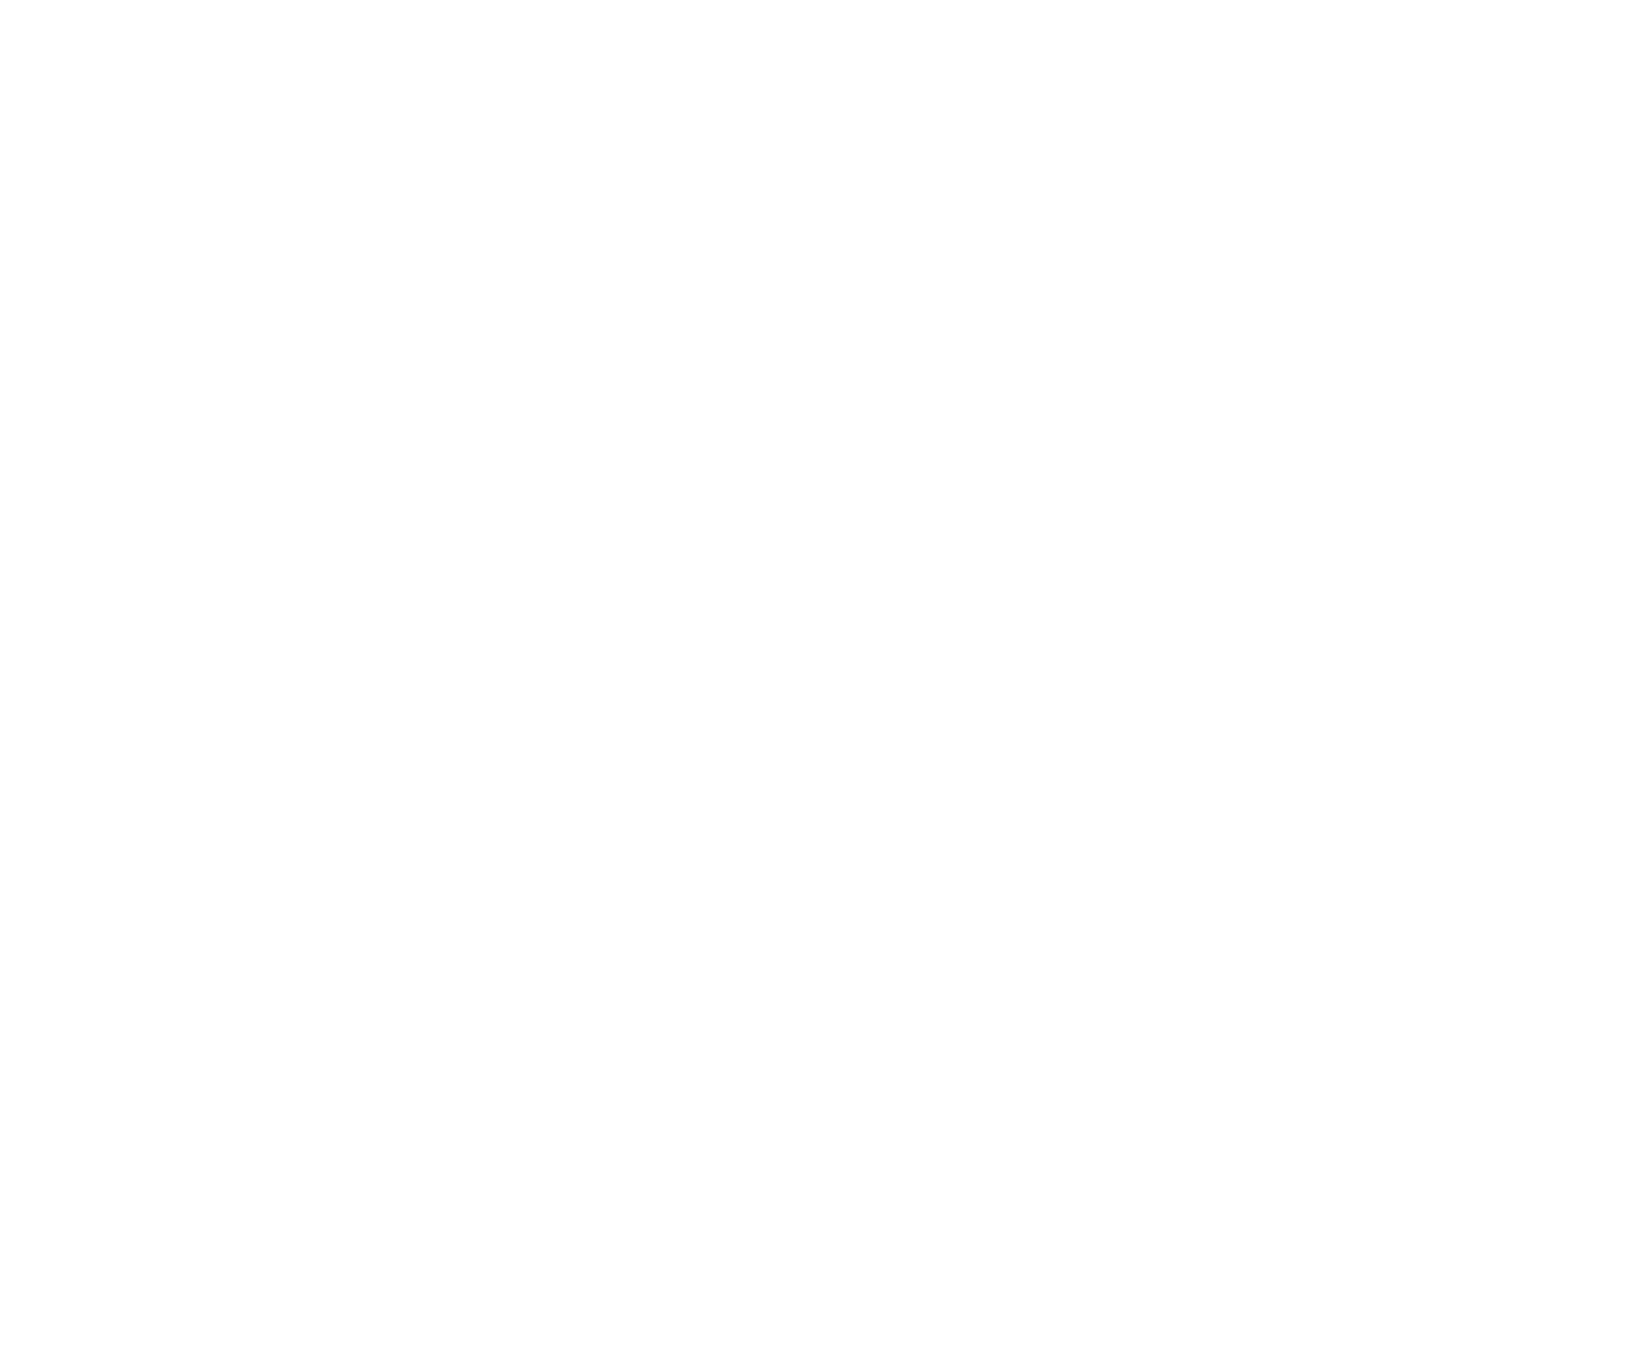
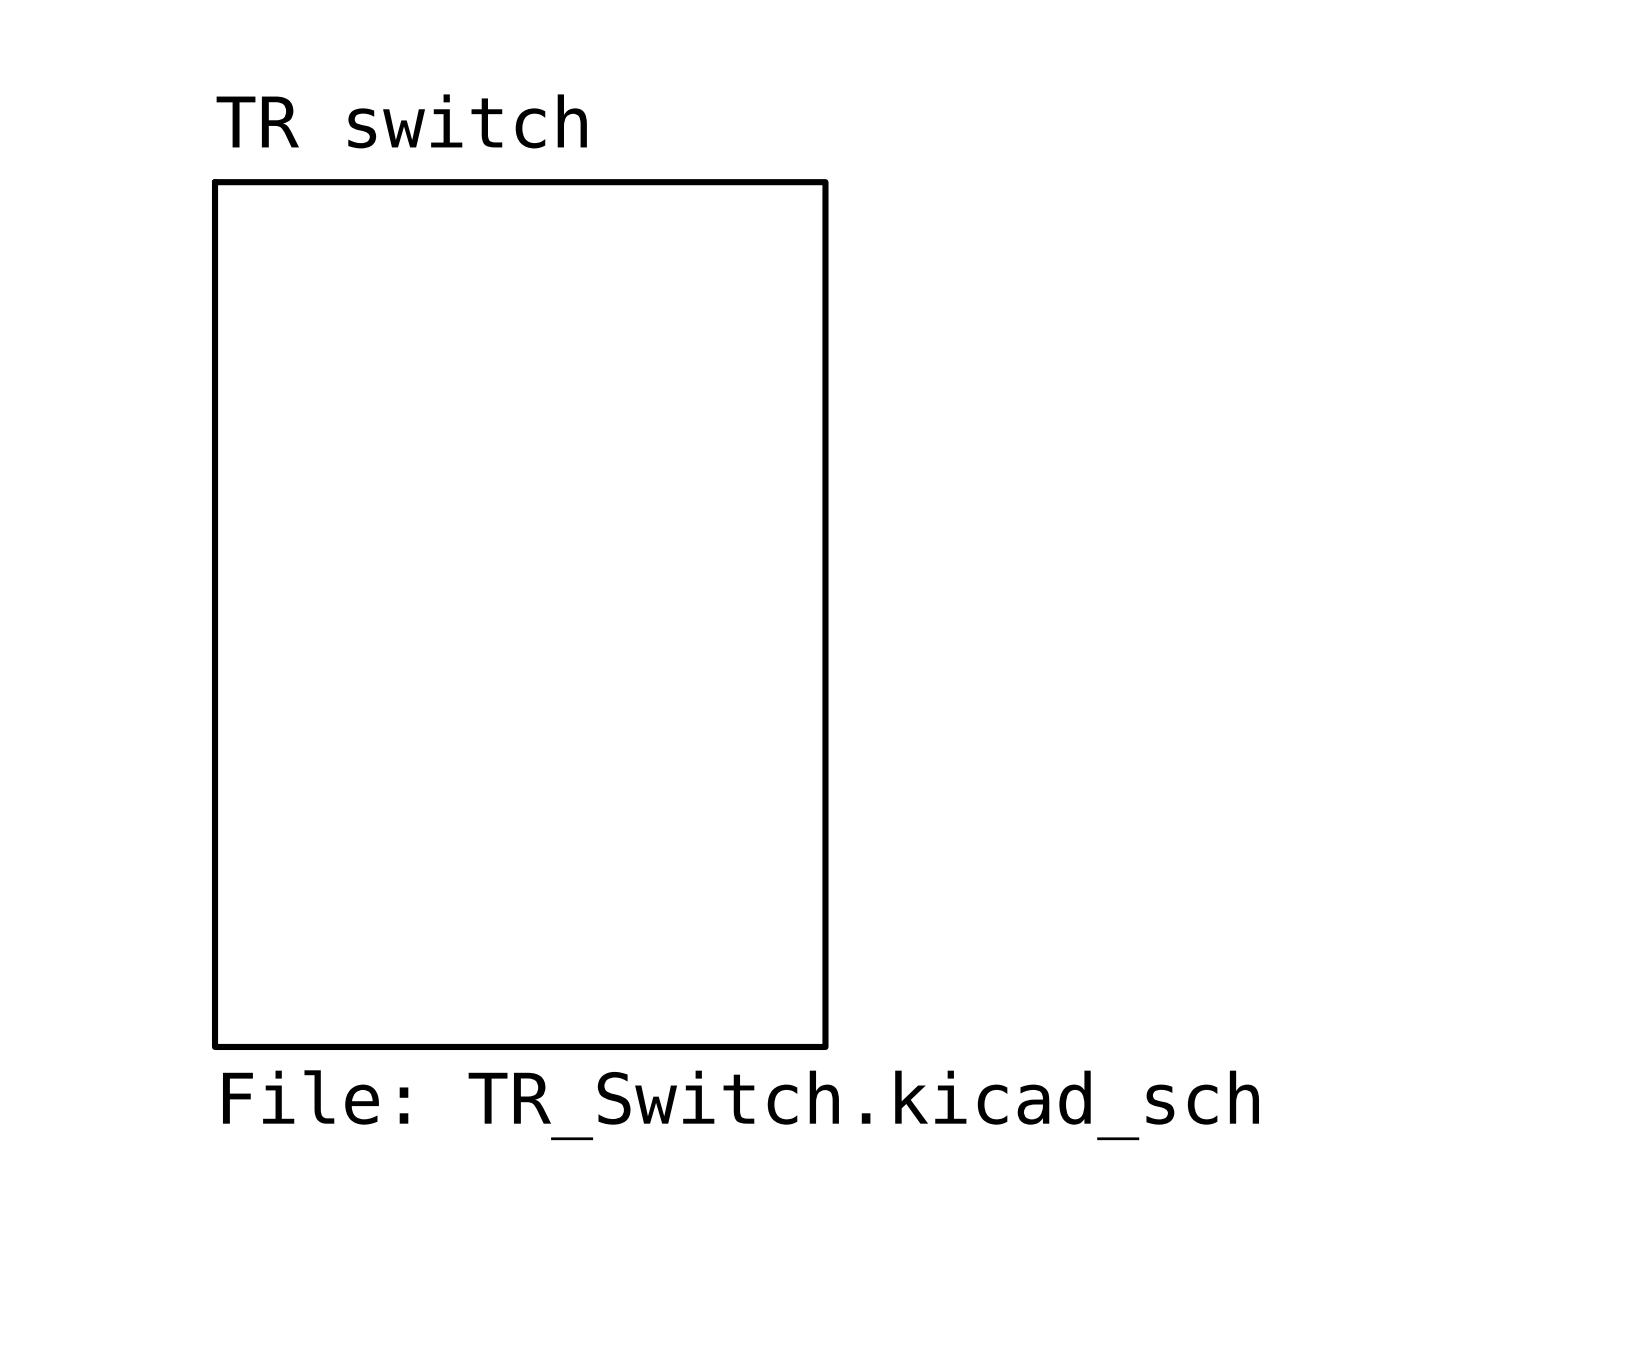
sheet TR switch: none -> File: TR_Switch.kicad_sch (520, 614)

